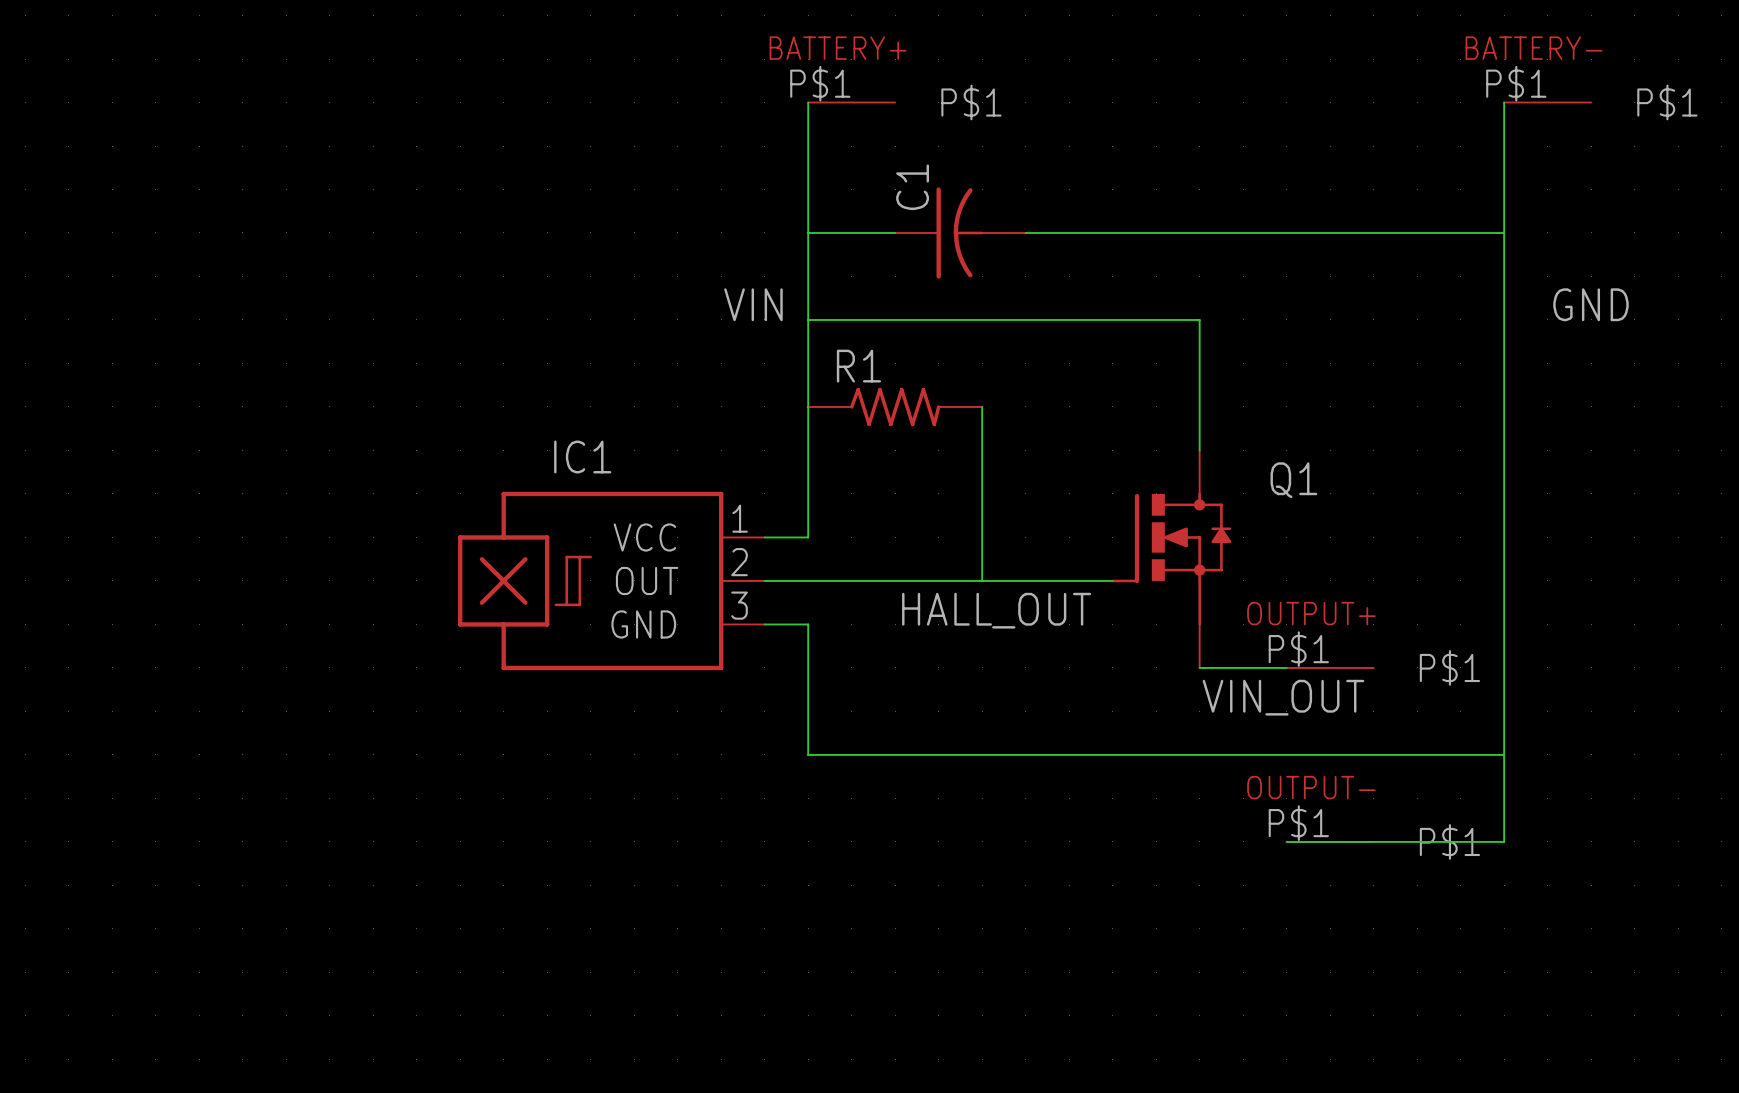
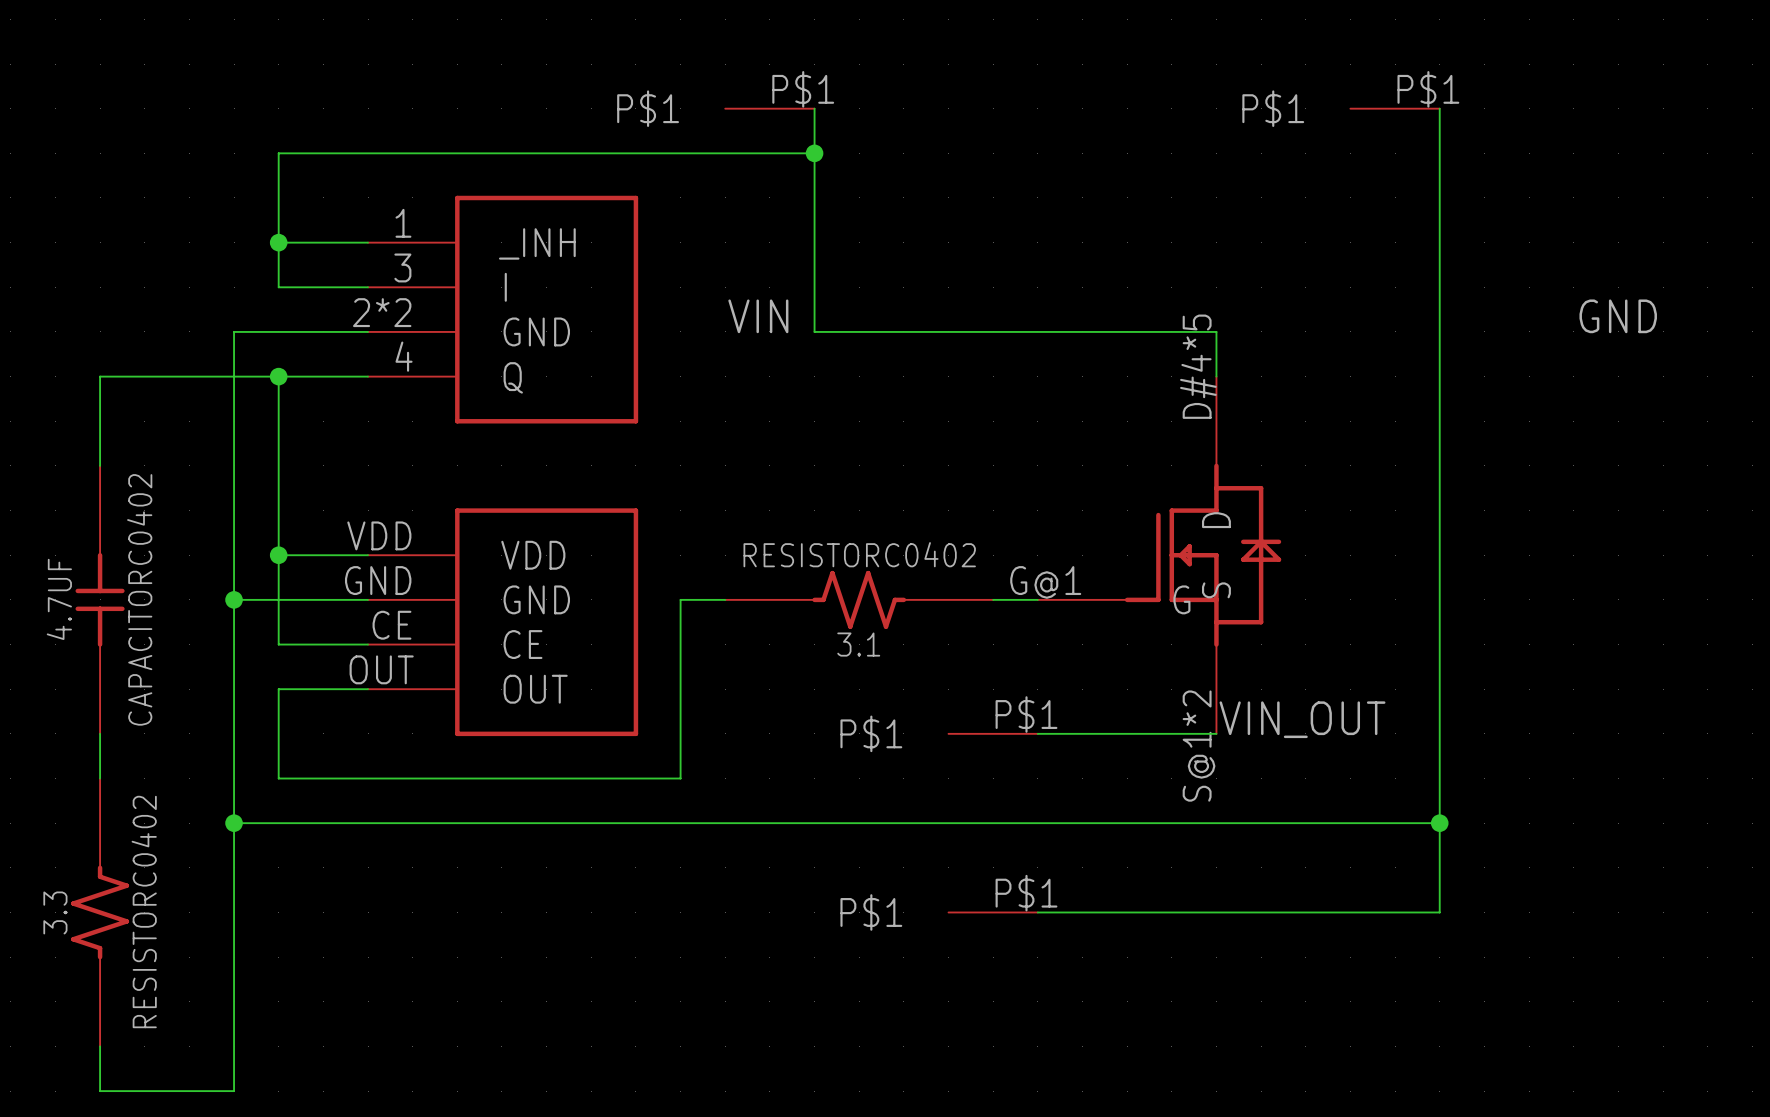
part: none -> (769, 108)
BATTERY+: (851, 102) -> none
part: none -> (1395, 108)
wire: none -> (1439, 108) (1439, 912) (1037, 912)
wire: (1504, 102) (1504, 841) (1286, 841) -> none
BATTERY-: (1547, 102) -> none
wire: none -> (814, 153) (278, 153) (278, 287) (368, 287)
junction: none -> (814, 153)
wire: none -> (278, 242) (368, 242)
junction: none -> (278, 242)
wire: (808, 232) (895, 232) -> none
C1: (960, 232) -> none
wire: (1025, 232) (1504, 232) -> none
part: none -> (503, 309)
wire: none -> (368, 331) (234, 331) (234, 1091) (100, 1091) (100, 1046)
wire: (808, 319) (808, 537) (764, 537) -> none
wire: none -> (278, 376) (278, 644) (368, 644)
junction: none -> (278, 376)
wire: none -> (368, 376) (100, 376) (100, 465)
R1: (895, 406) -> none
wire: (982, 406) (982, 580) (764, 580) -> none
wire: none -> (278, 555) (368, 555)
junction: none -> (278, 555)
part: none -> (1159, 555)
Q1: (1171, 559) -> none
4.7UF: none -> CAPACITORC0402 (100, 599)
wire: none -> (234, 599) (368, 599)
junction: none -> (234, 599)
IC1: (611, 580) -> none
wire: none -> (725, 599) (680, 599) (680, 778) (278, 778) (278, 689) (368, 689)
3.1: none -> RESISTORC0402 (859, 599)
part: none -> (503, 622)
label: HALL_OUT (996, 610) -> none
wire: (764, 624) (808, 624) (808, 754) (1504, 754) -> none
wire: (1199, 667) (1286, 667) -> none
OUTPUT+: (1330, 667) -> none
wire: none -> (100, 733) (100, 778)
part: none -> (993, 733)
wire: none -> (1037, 733) (1216, 733)
wire: none -> (234, 823) (1439, 823)
junction: none -> (234, 823)
junction: none -> (1439, 823)
OUTPUT-: (1330, 841) -> none
3.3: none -> RESISTORC0402 (100, 912)
part: none -> (993, 912)

